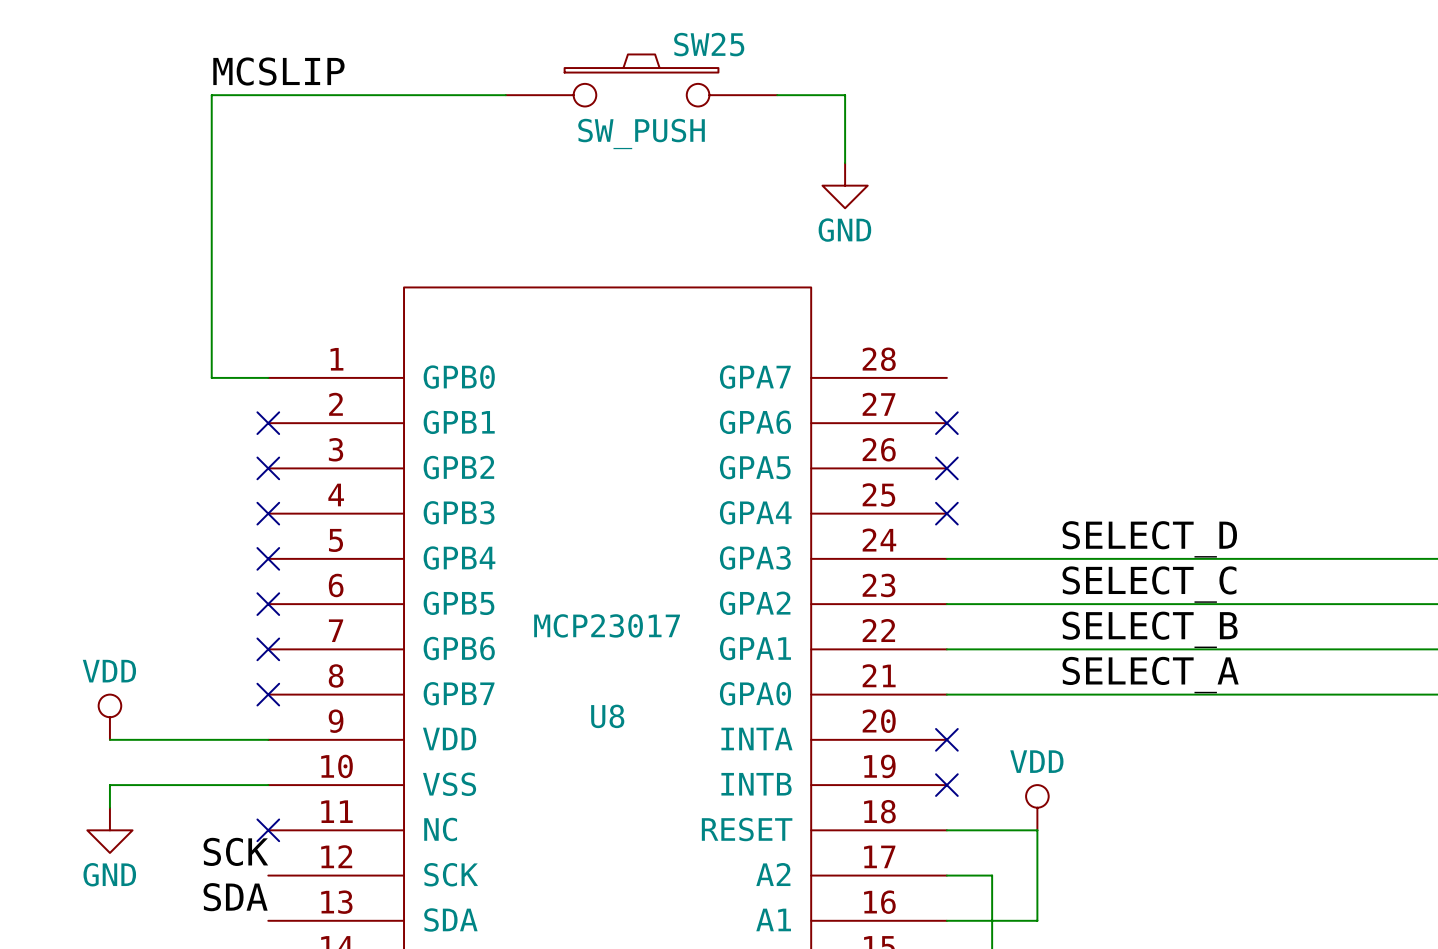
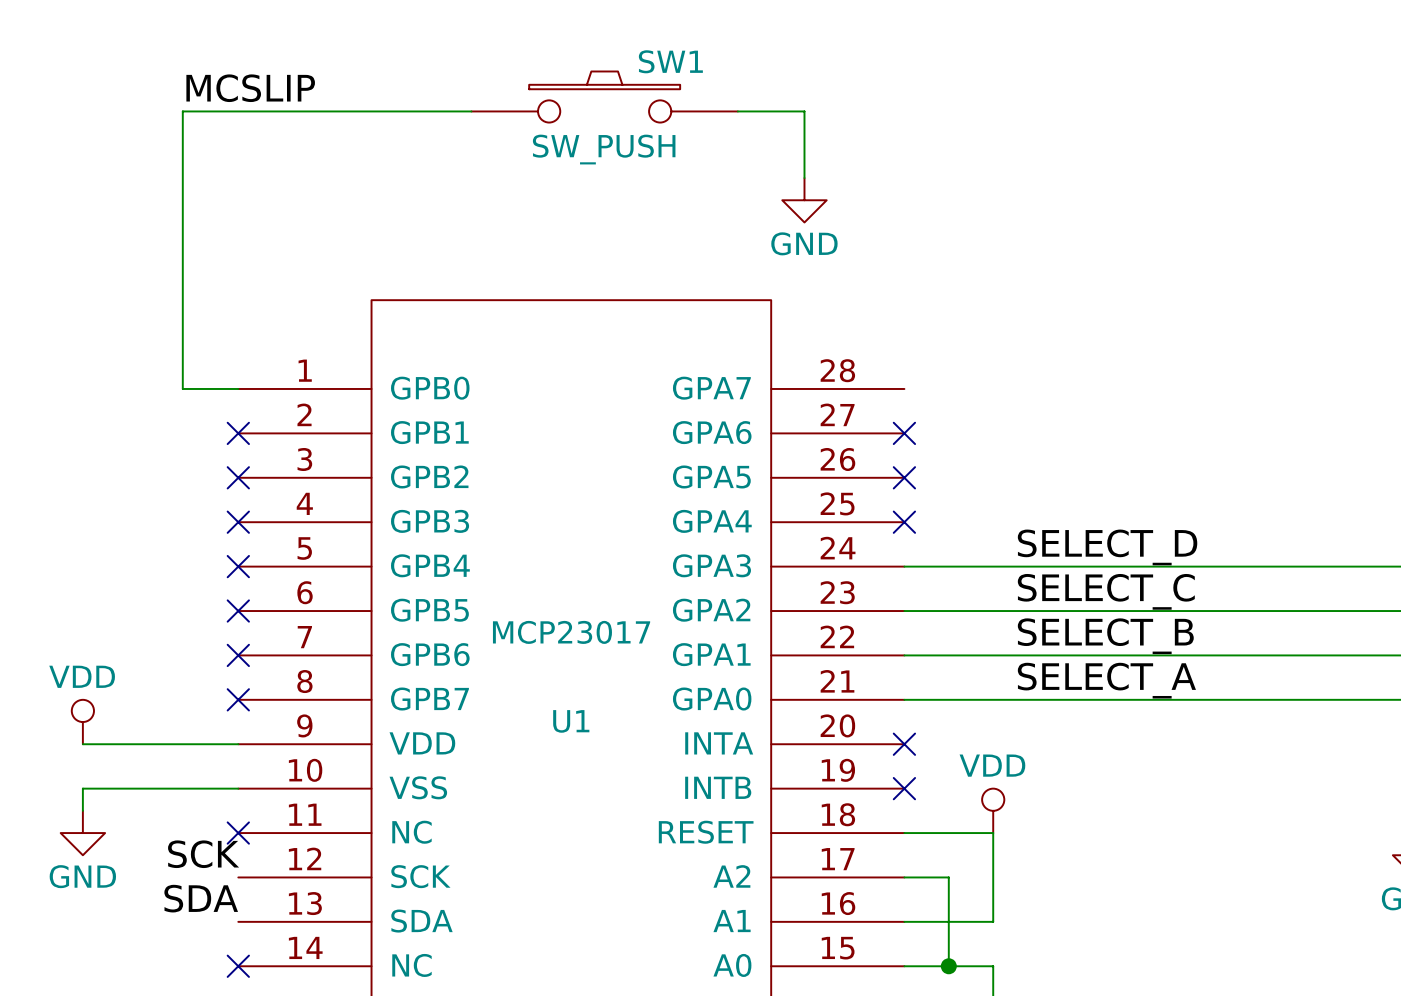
SW25 name: SW25 (709, 44) -> SW1 (670, 61)
U8 name: U8 (607, 716) -> U1 (571, 721)

